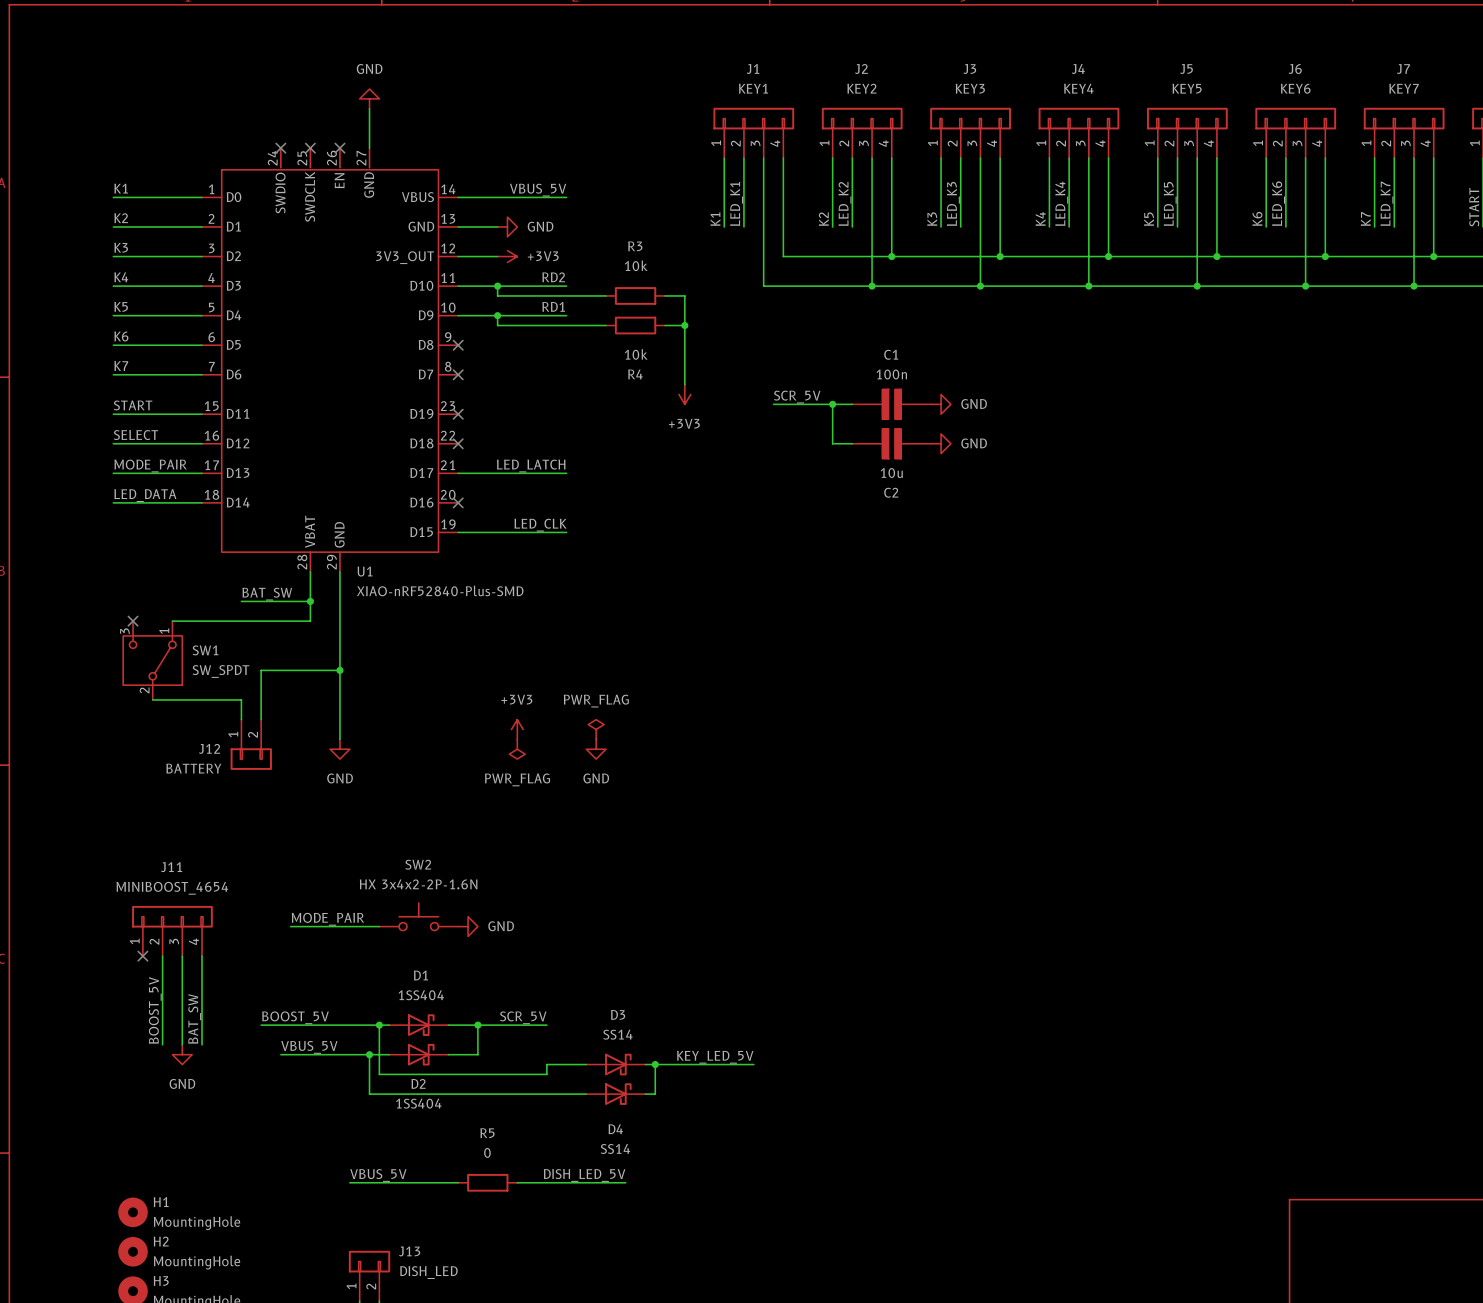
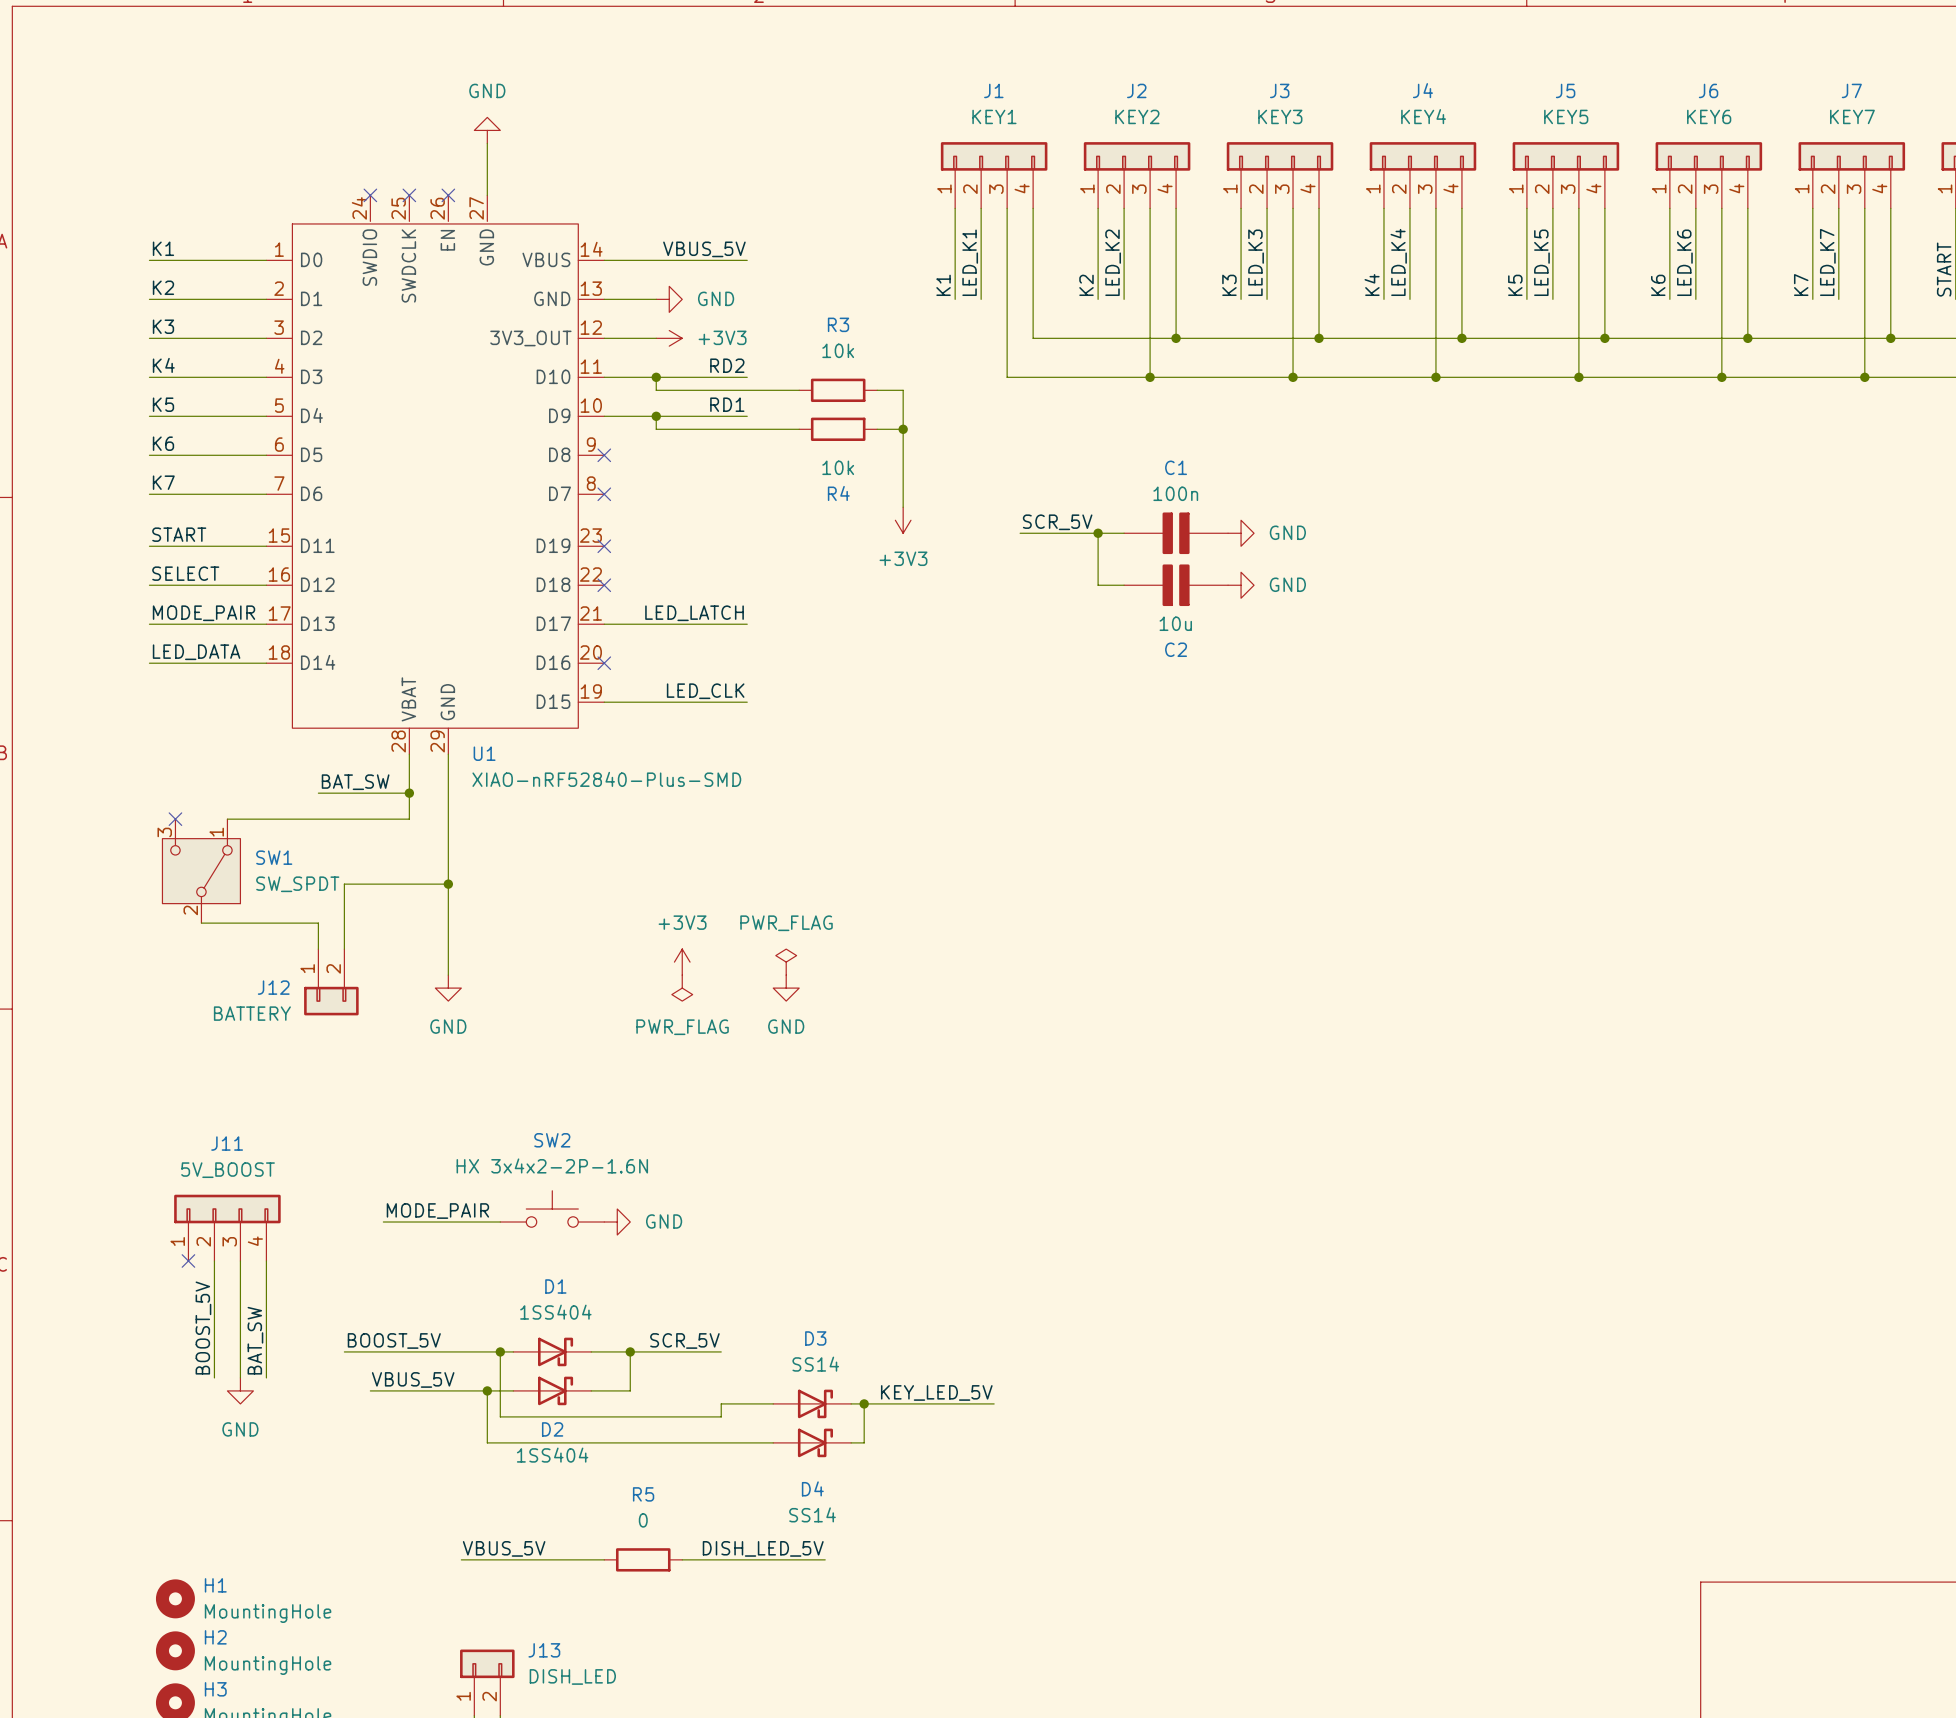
J11 value: MINIBOOST_4654 (172, 888) -> 5V_BOOST (228, 1170)

